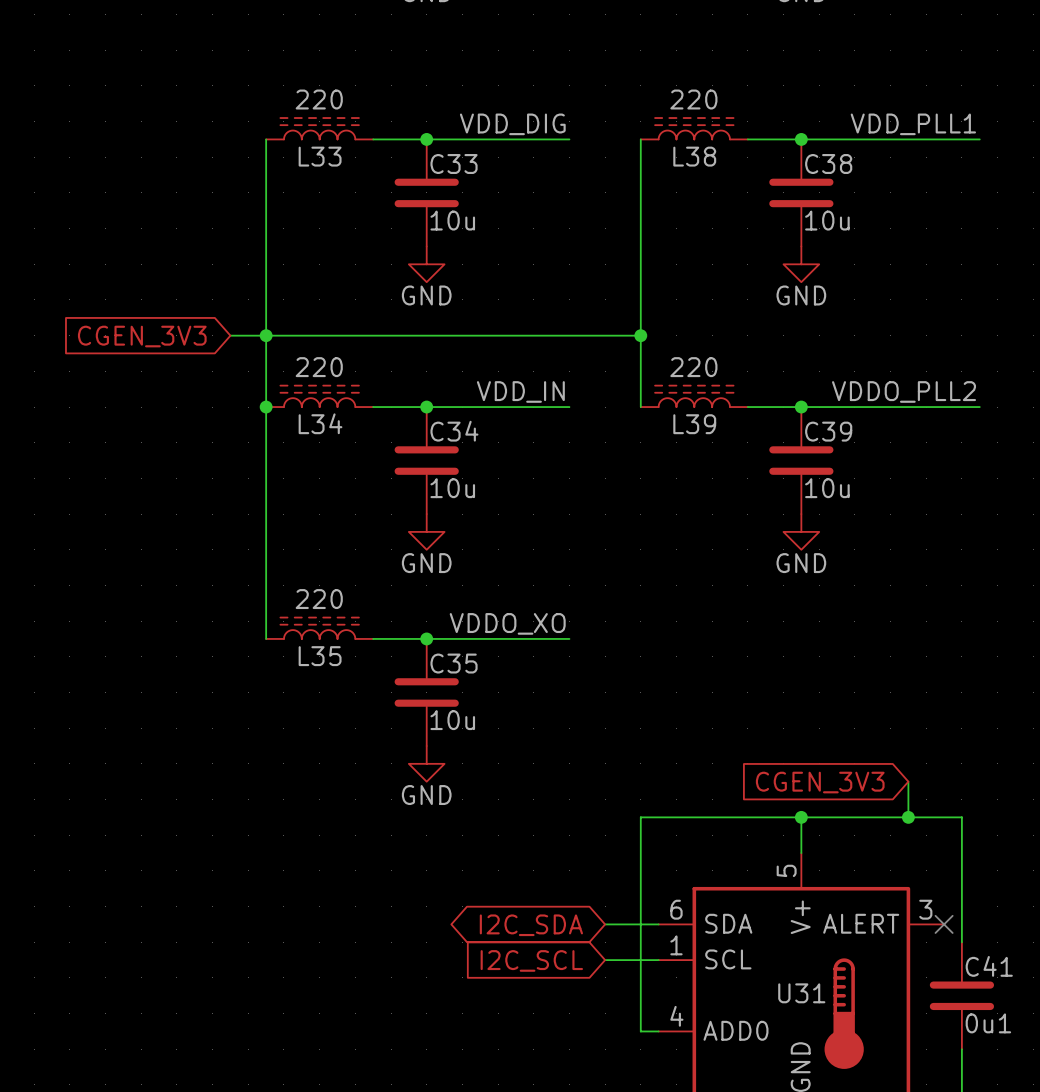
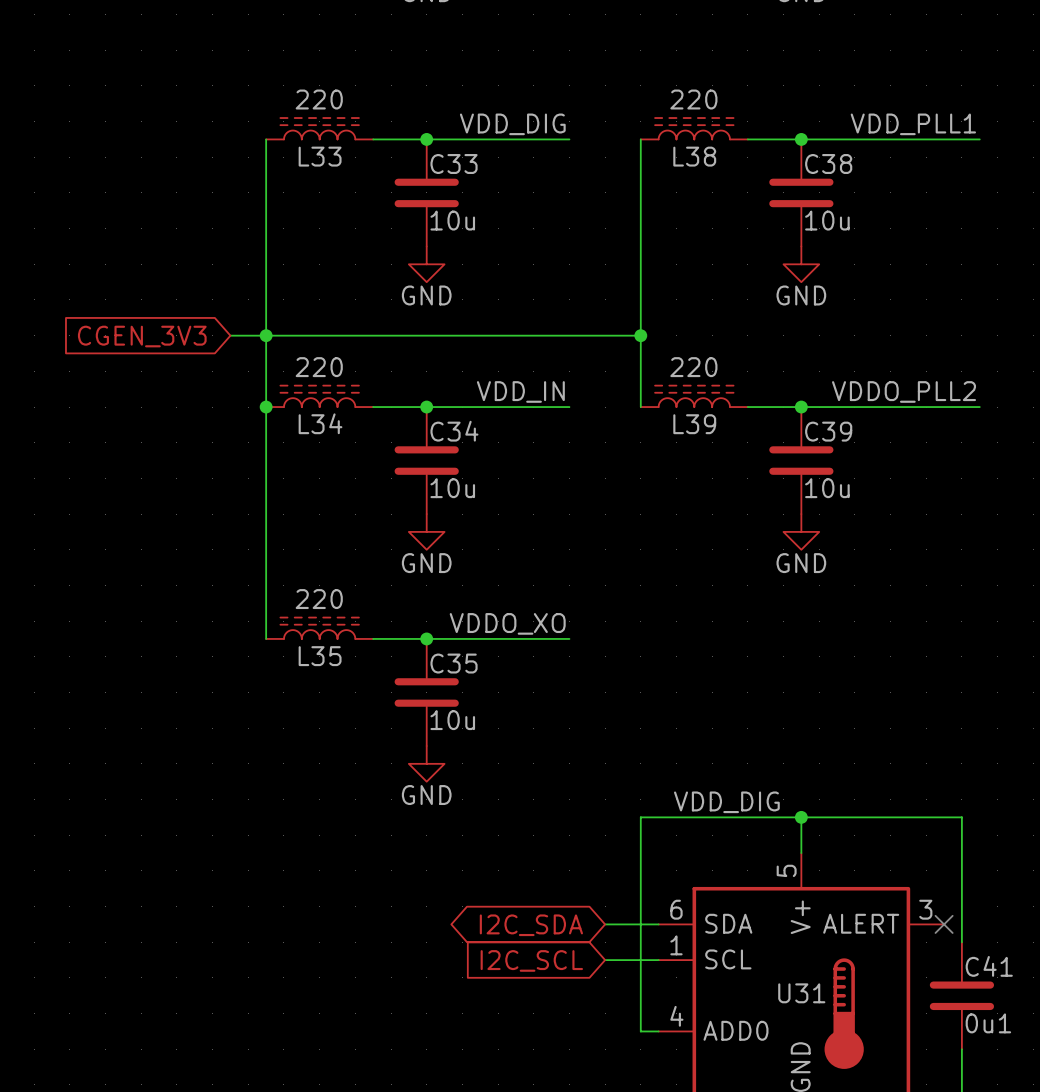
wire: (908, 781) (908, 817) -> none
global label: CGEN_3V3 (820, 782) -> none
label: none -> VDD_DIG (726, 802)
junction: (908, 817) -> none

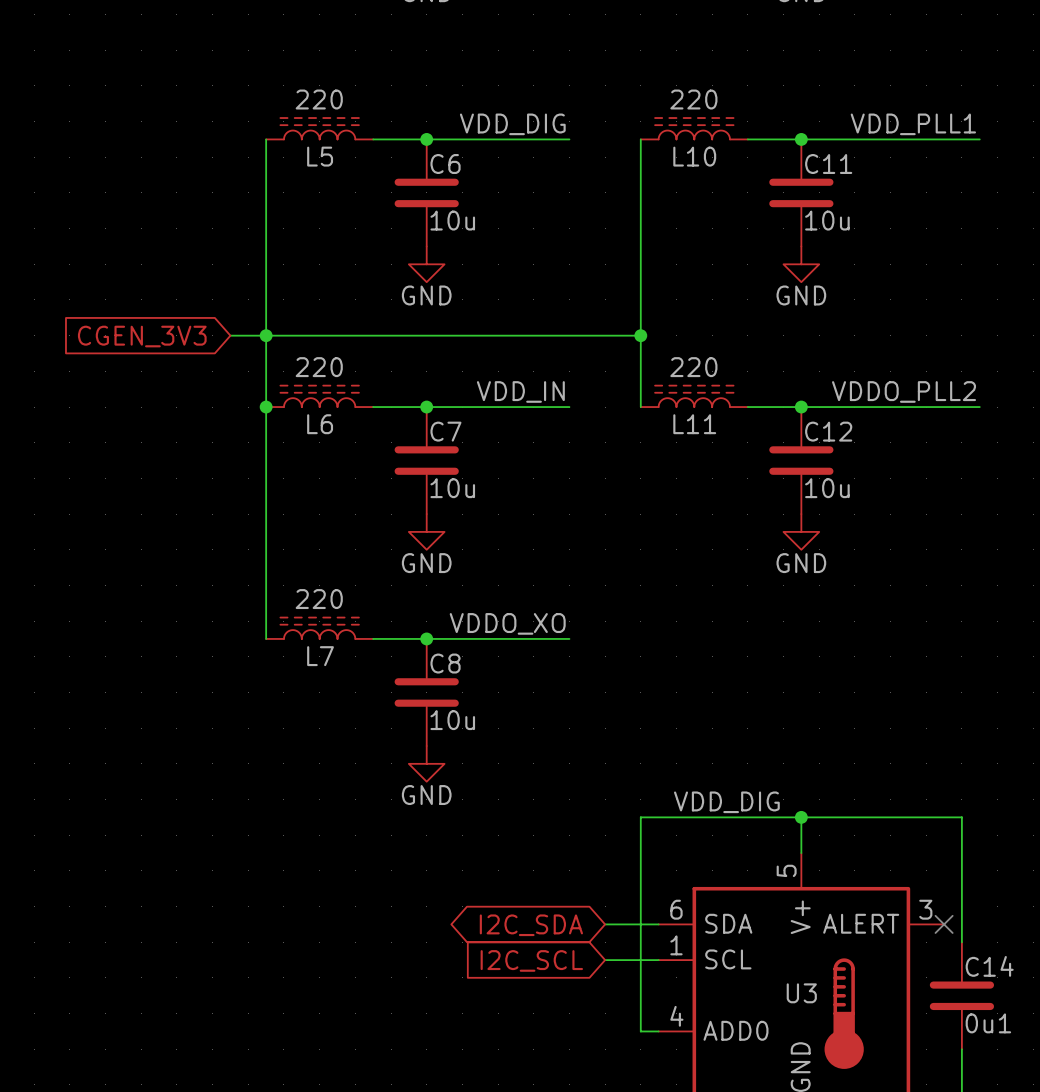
L33 name: L33 (320, 156) -> L5 (320, 156)
L38 name: L38 (694, 156) -> L10 (694, 156)
C33 name: C33 (454, 164) -> C6 (445, 164)
C38 name: C38 (828, 164) -> C11 (828, 164)
L34 name: L34 (320, 423) -> L6 (320, 424)
L39 name: L39 (694, 424) -> L11 (694, 424)
C34 name: C34 (454, 431) -> C7 (445, 431)
C39 name: C39 (828, 431) -> C12 (828, 431)
L35 name: L35 (320, 656) -> L7 (320, 656)
C35 name: C35 (454, 663) -> C8 (445, 663)
C41 name: C41 (989, 966) -> C14 (989, 966)
U31 name: U31 (801, 993) -> U3 (801, 993)

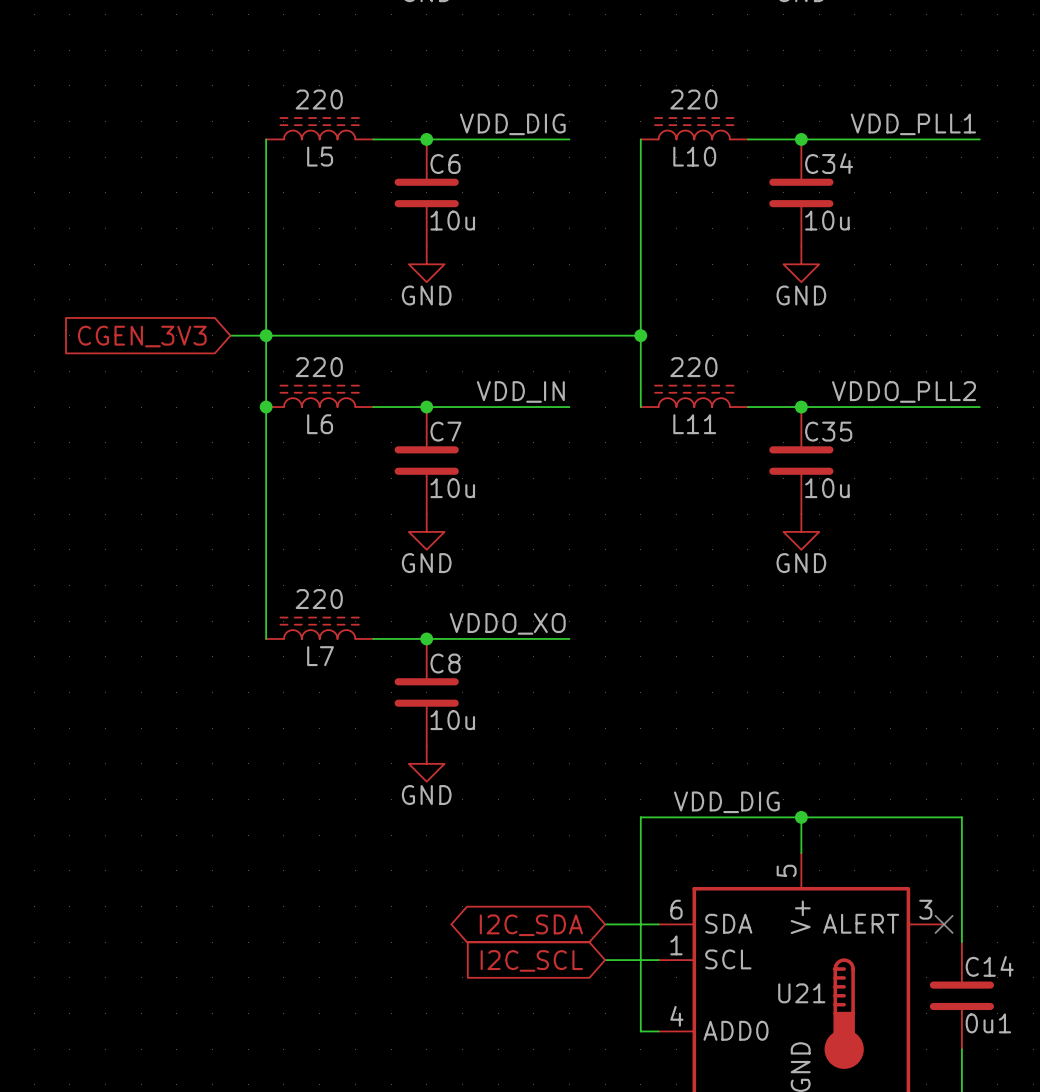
C11 name: C11 (828, 164) -> C34 (829, 163)
C12 name: C12 (828, 431) -> C35 (828, 431)
U3 name: U3 (801, 993) -> U21 (801, 993)

